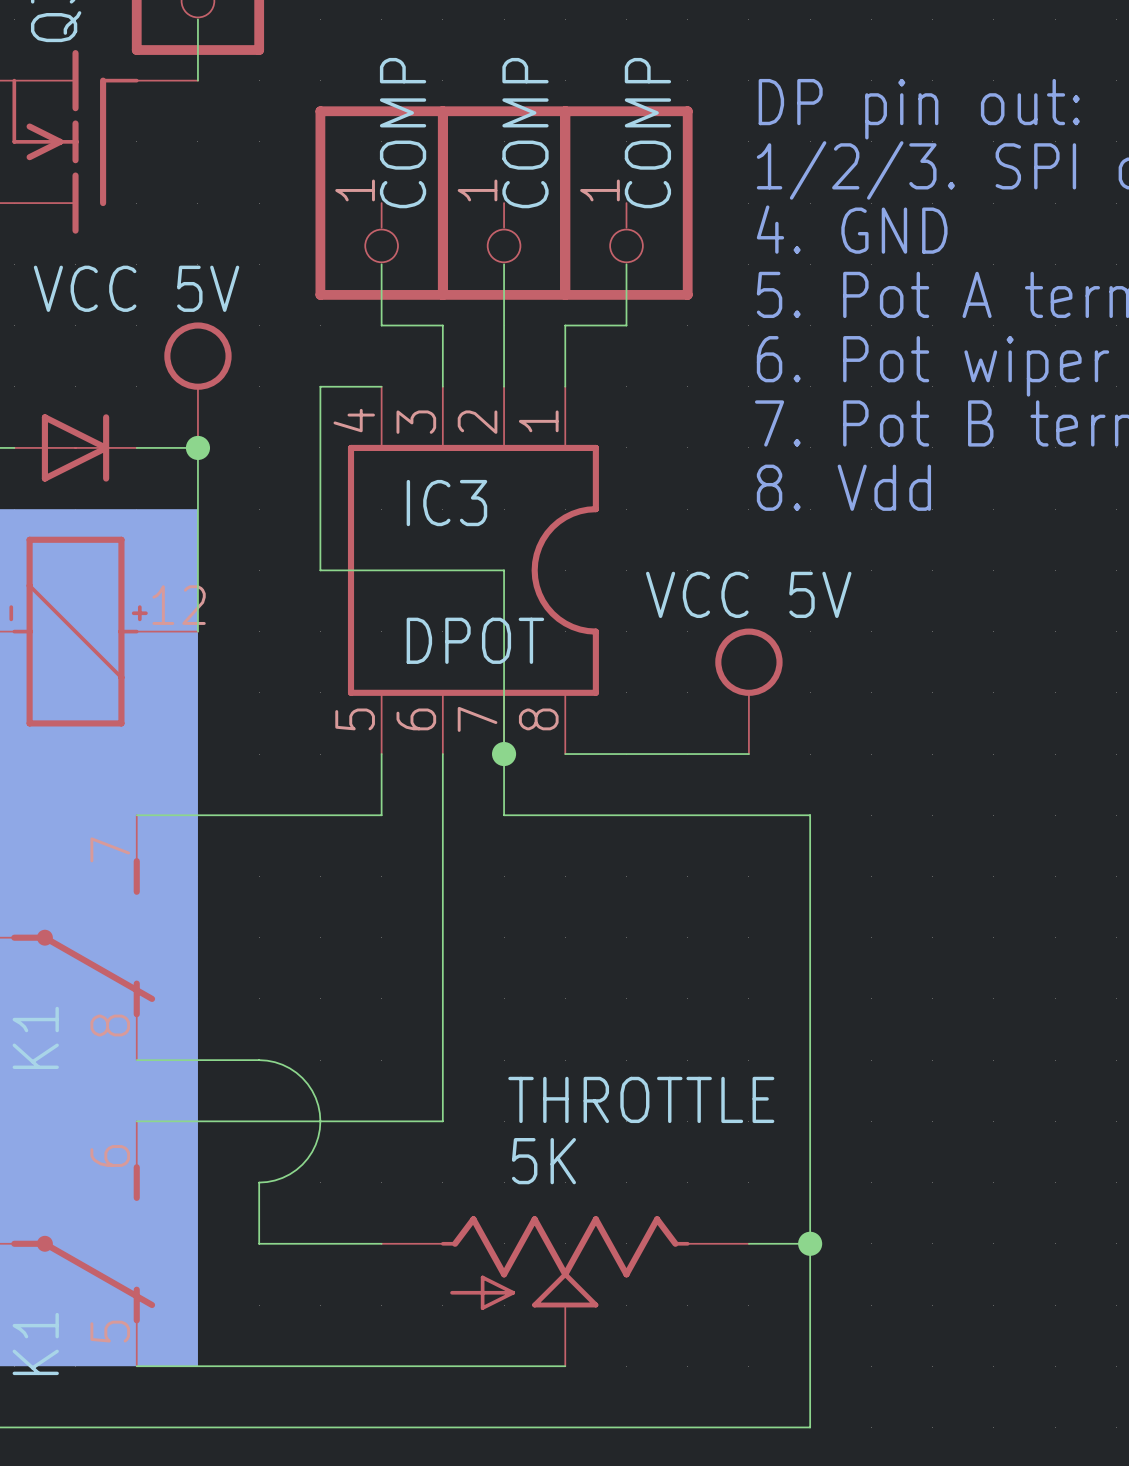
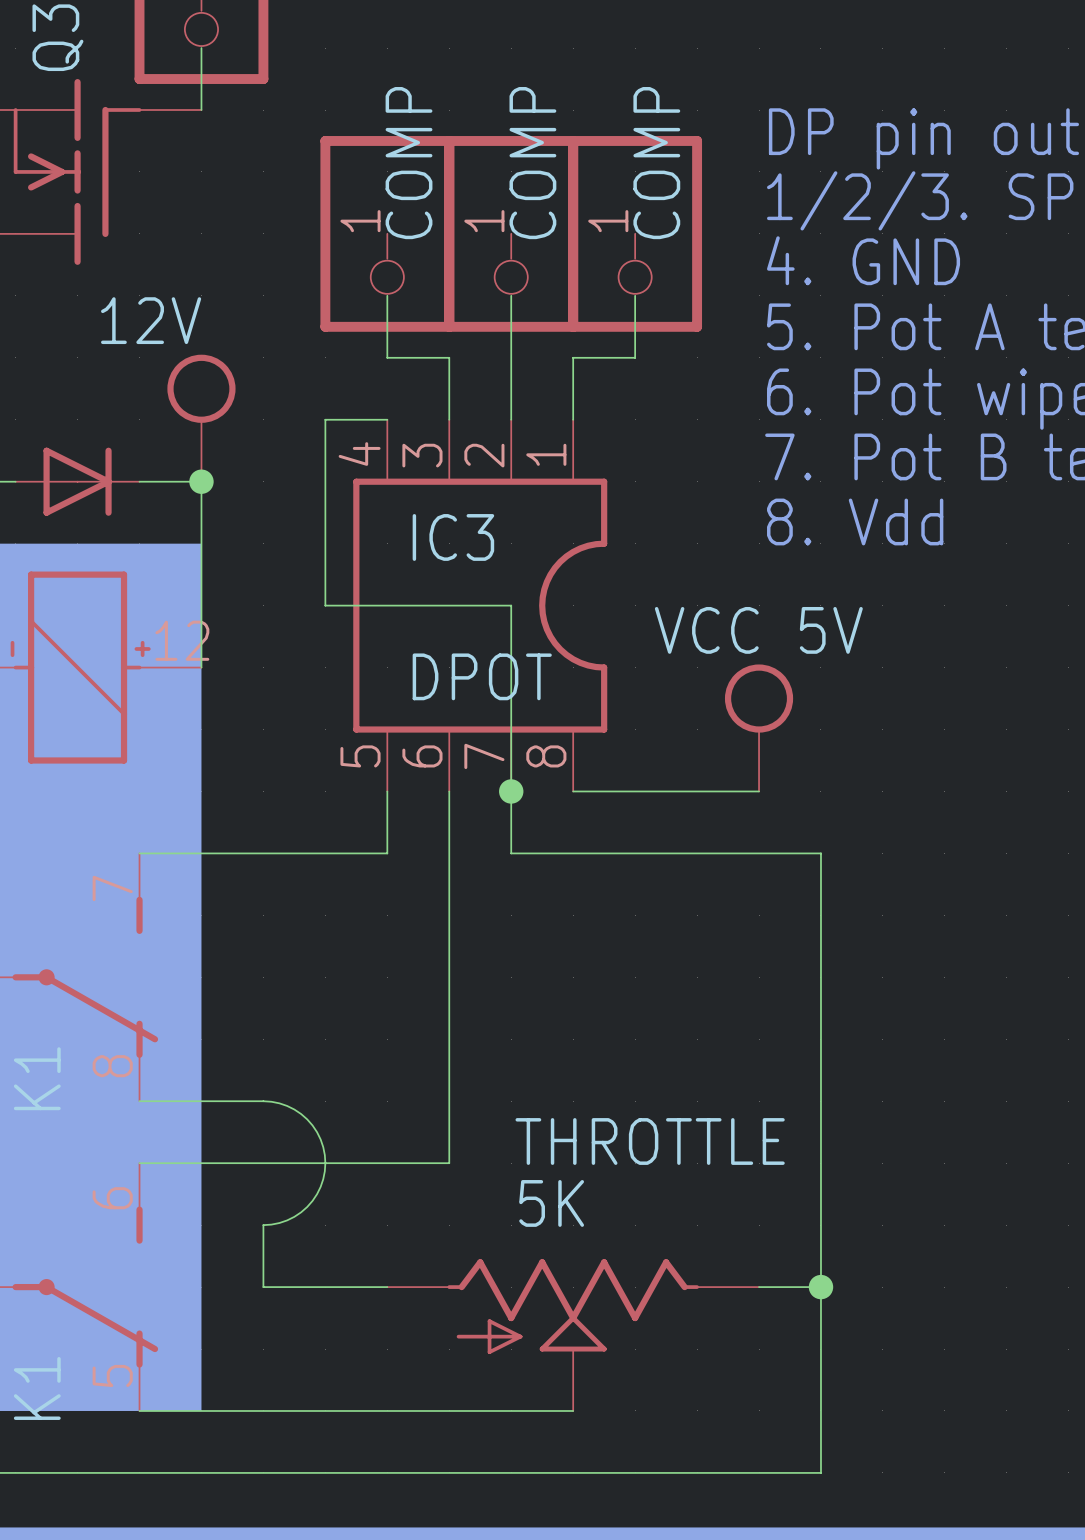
power symbol: VCC 5V (197, 385) -> 12V (201, 418)

